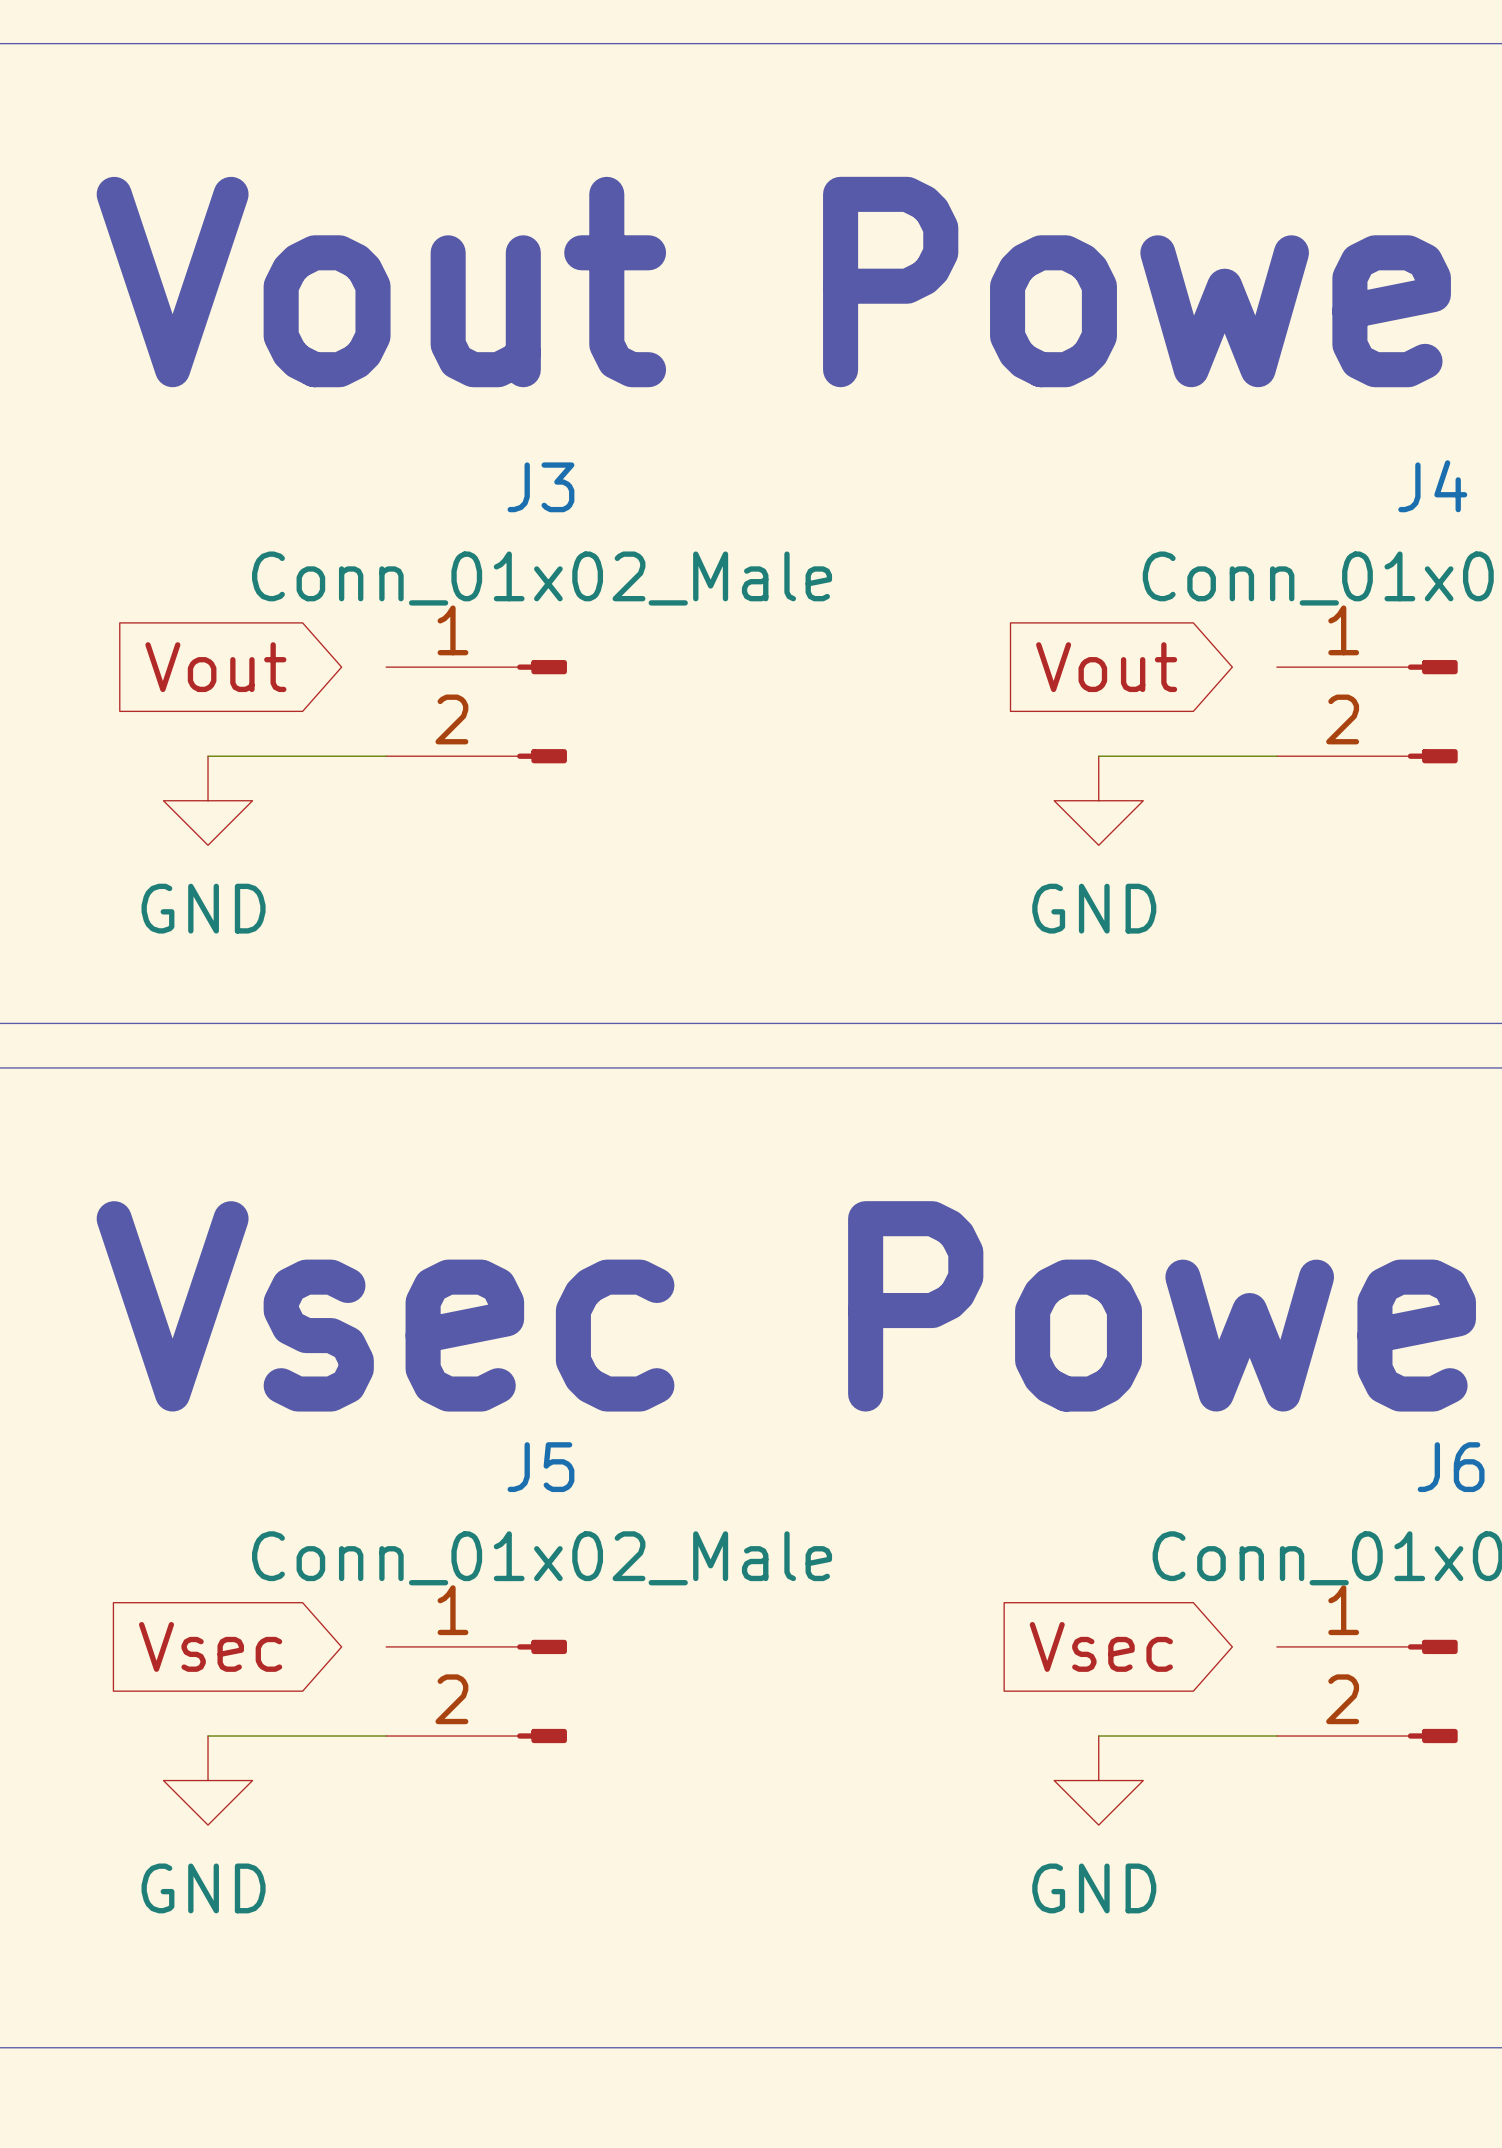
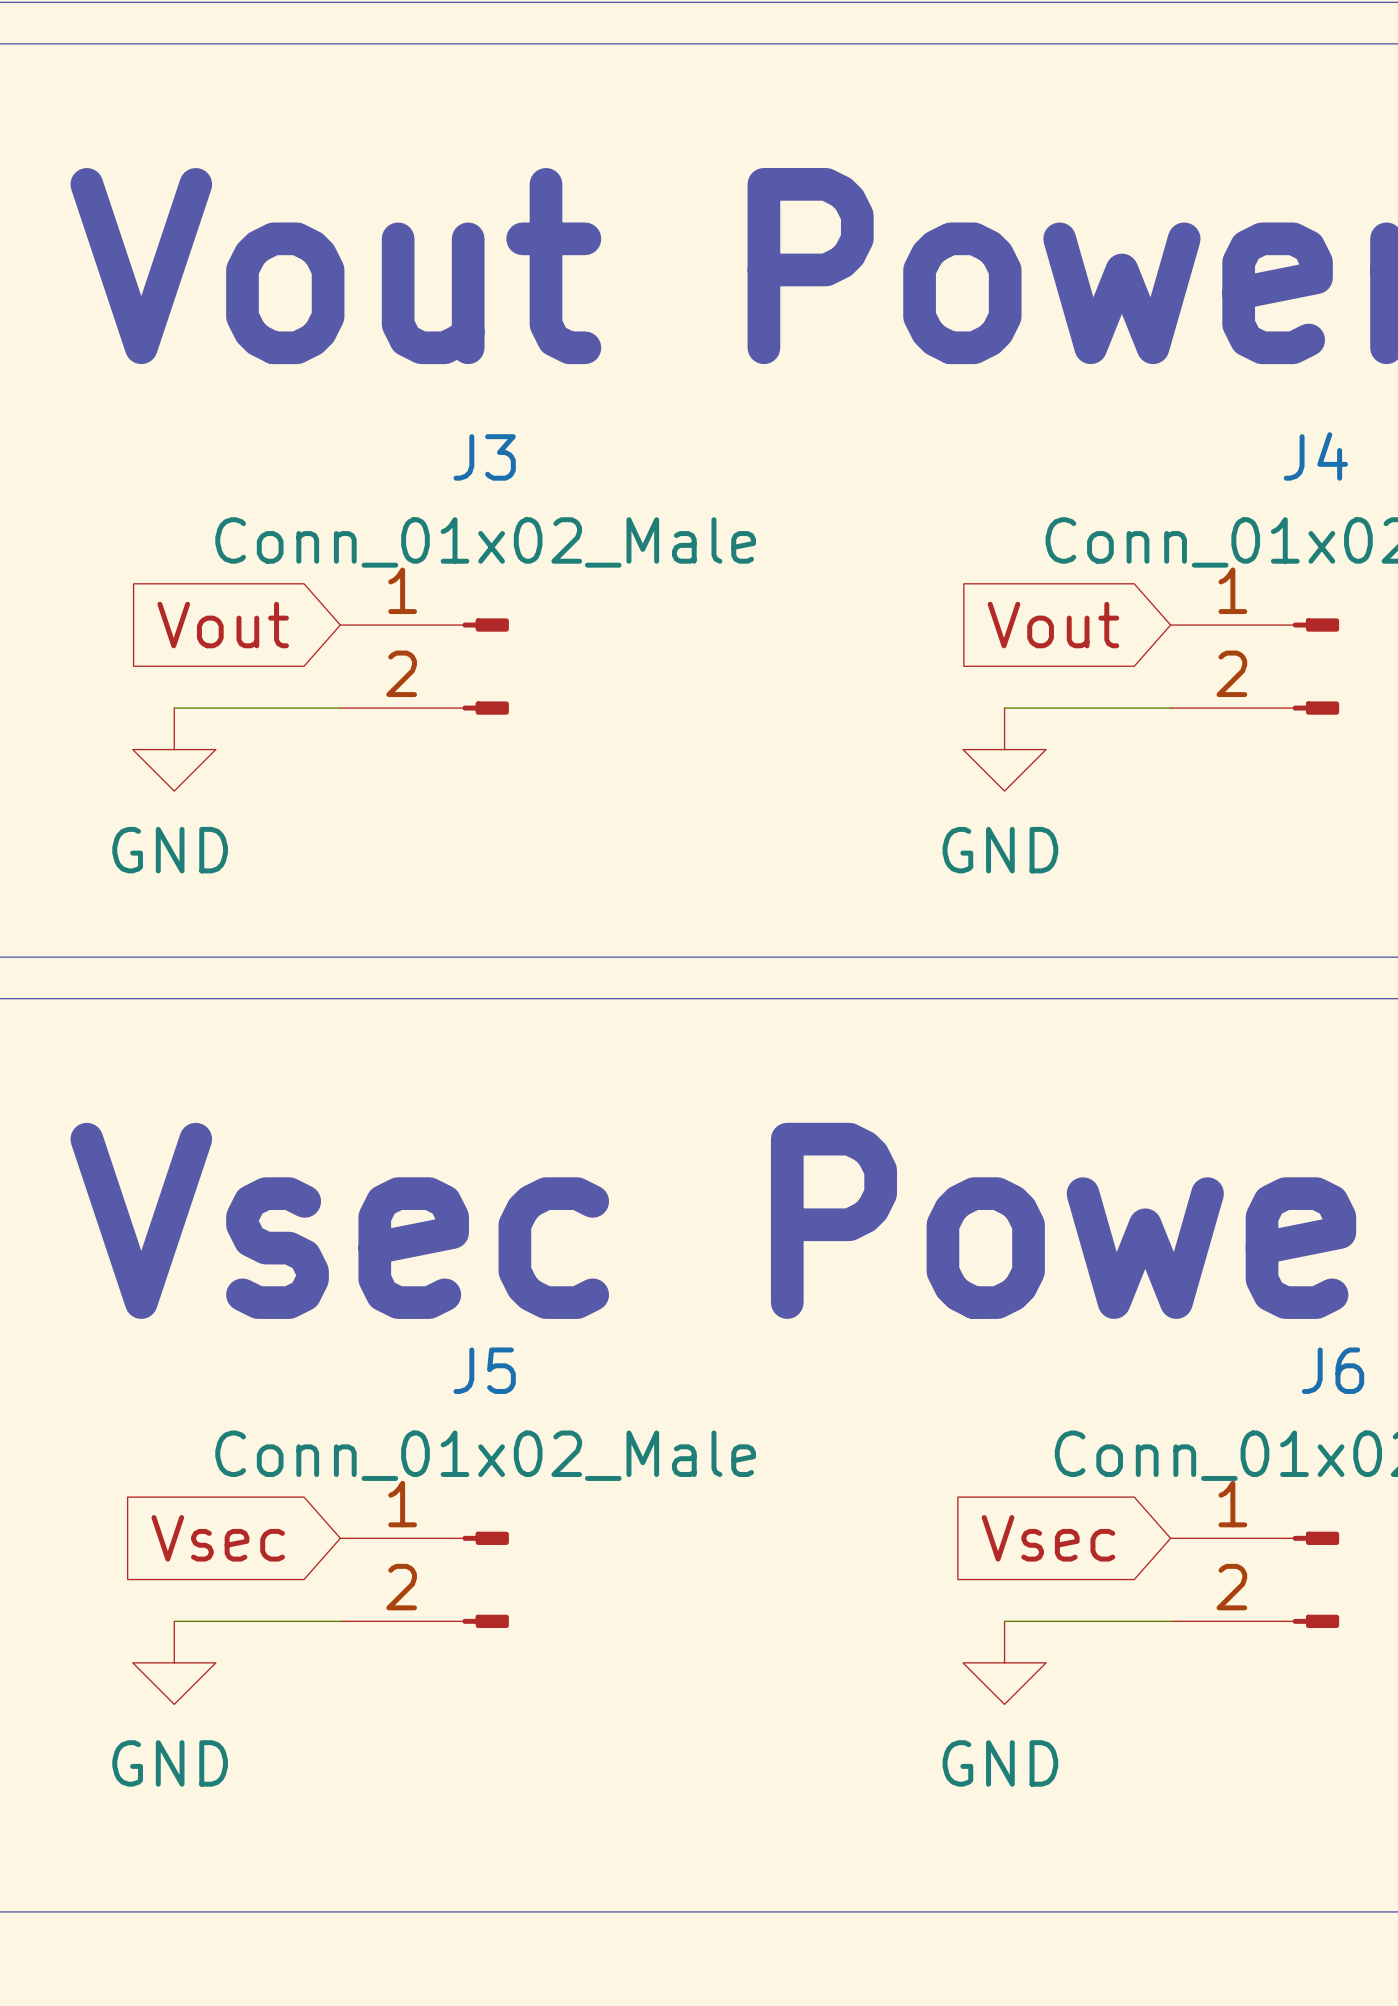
global label position: Vout (215, 667) -> Vout (223, 625)
global label position: Vout (1106, 667) -> Vout (1053, 625)
global label position: Vsec (210, 1646) -> Vsec (218, 1538)
global label position: Vsec (1101, 1646) -> Vsec (1048, 1538)

